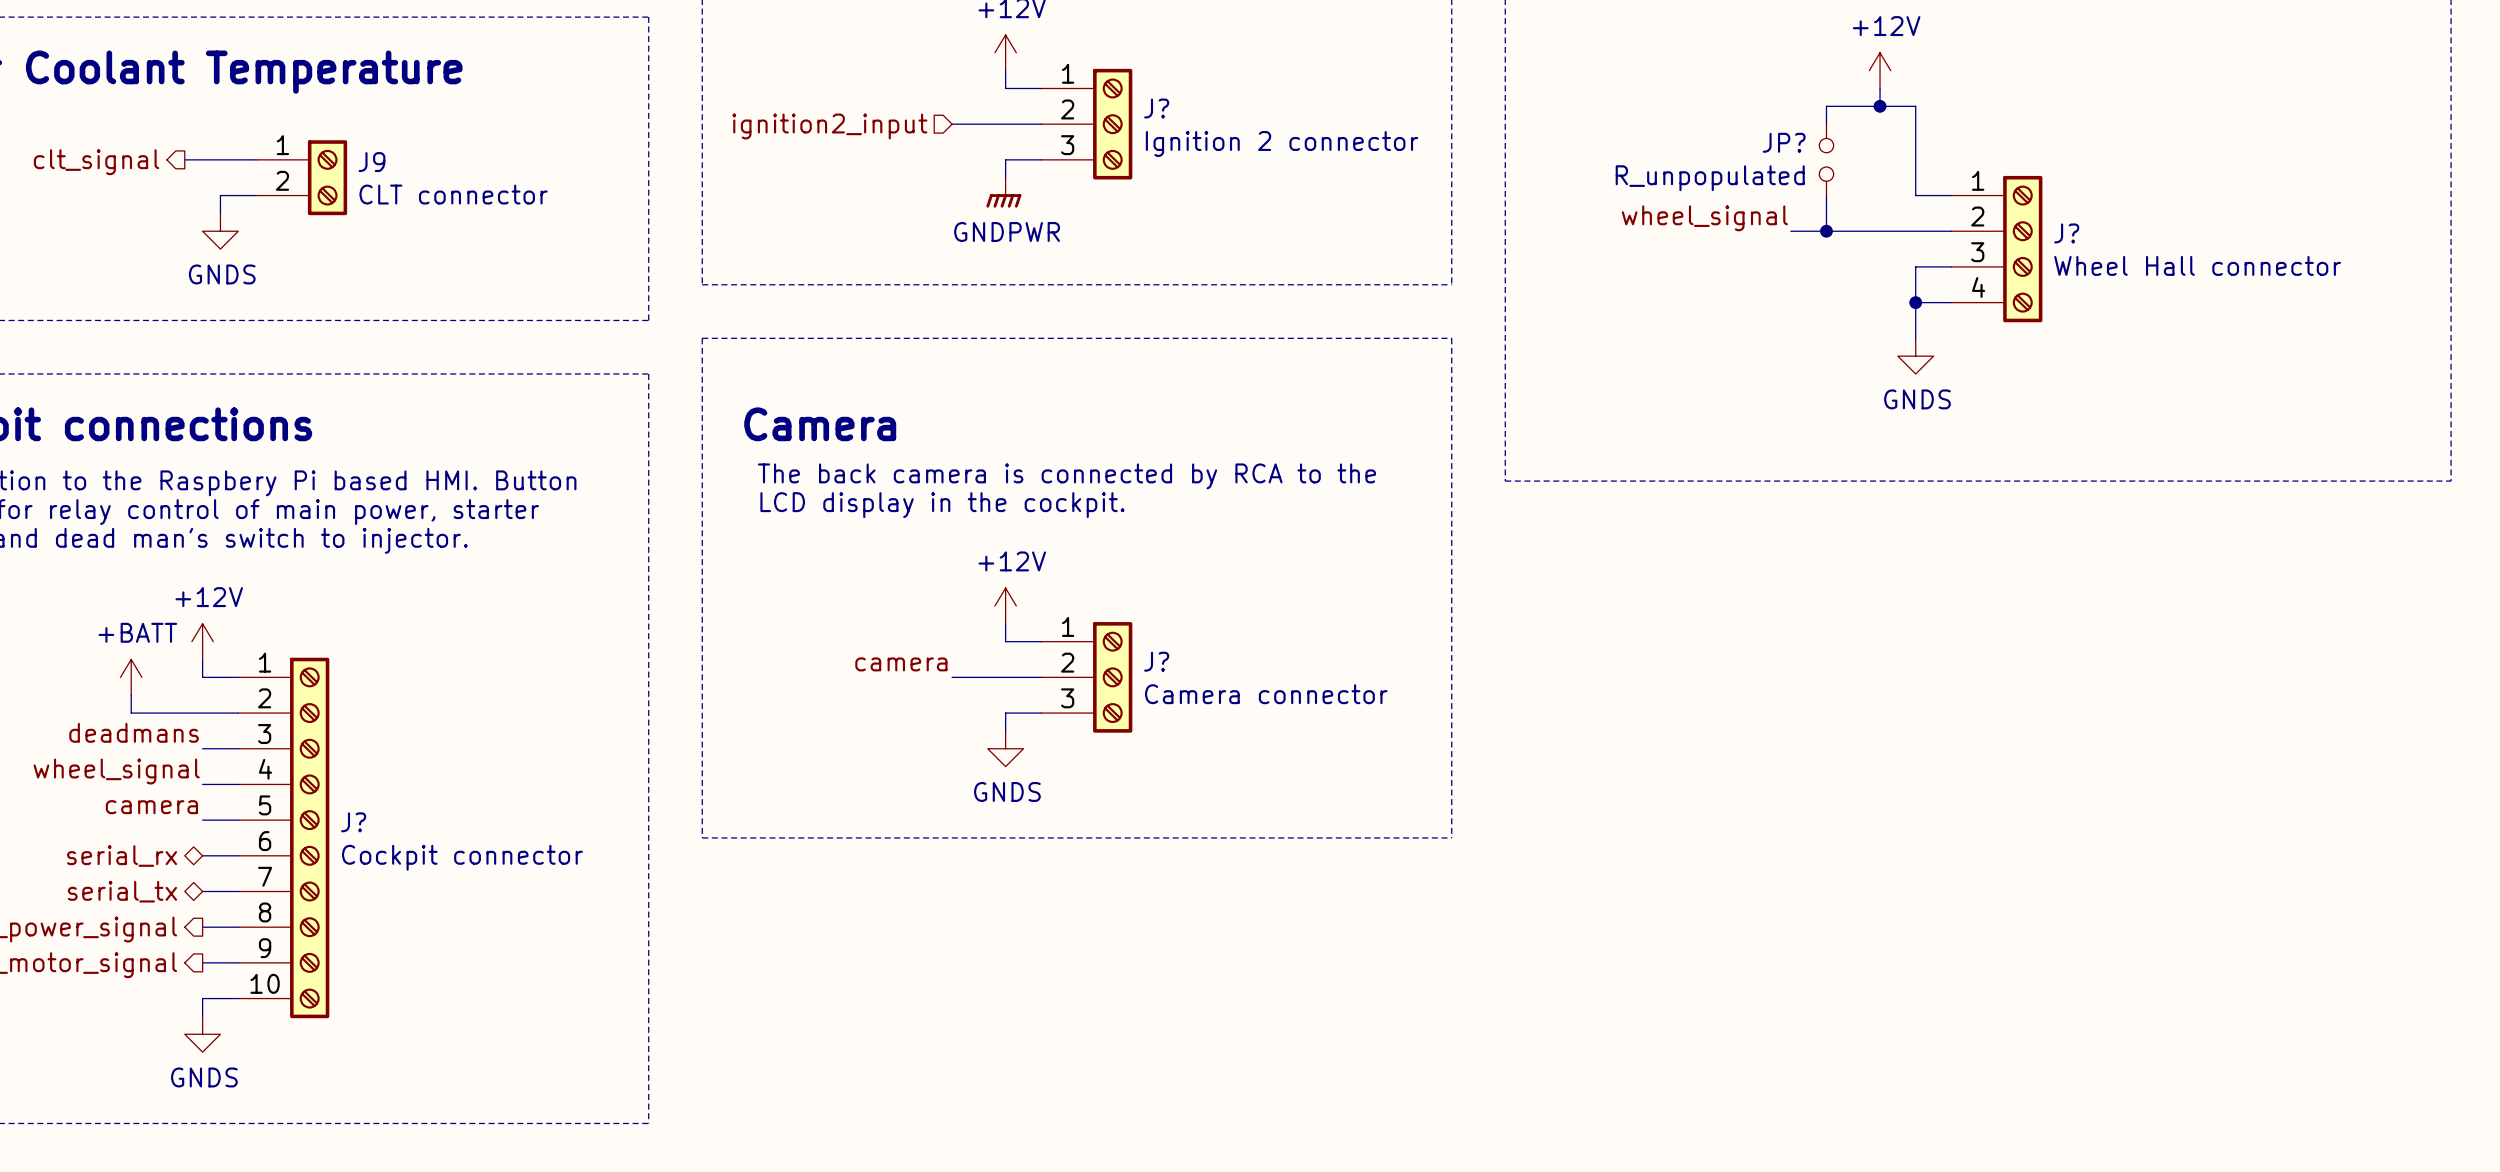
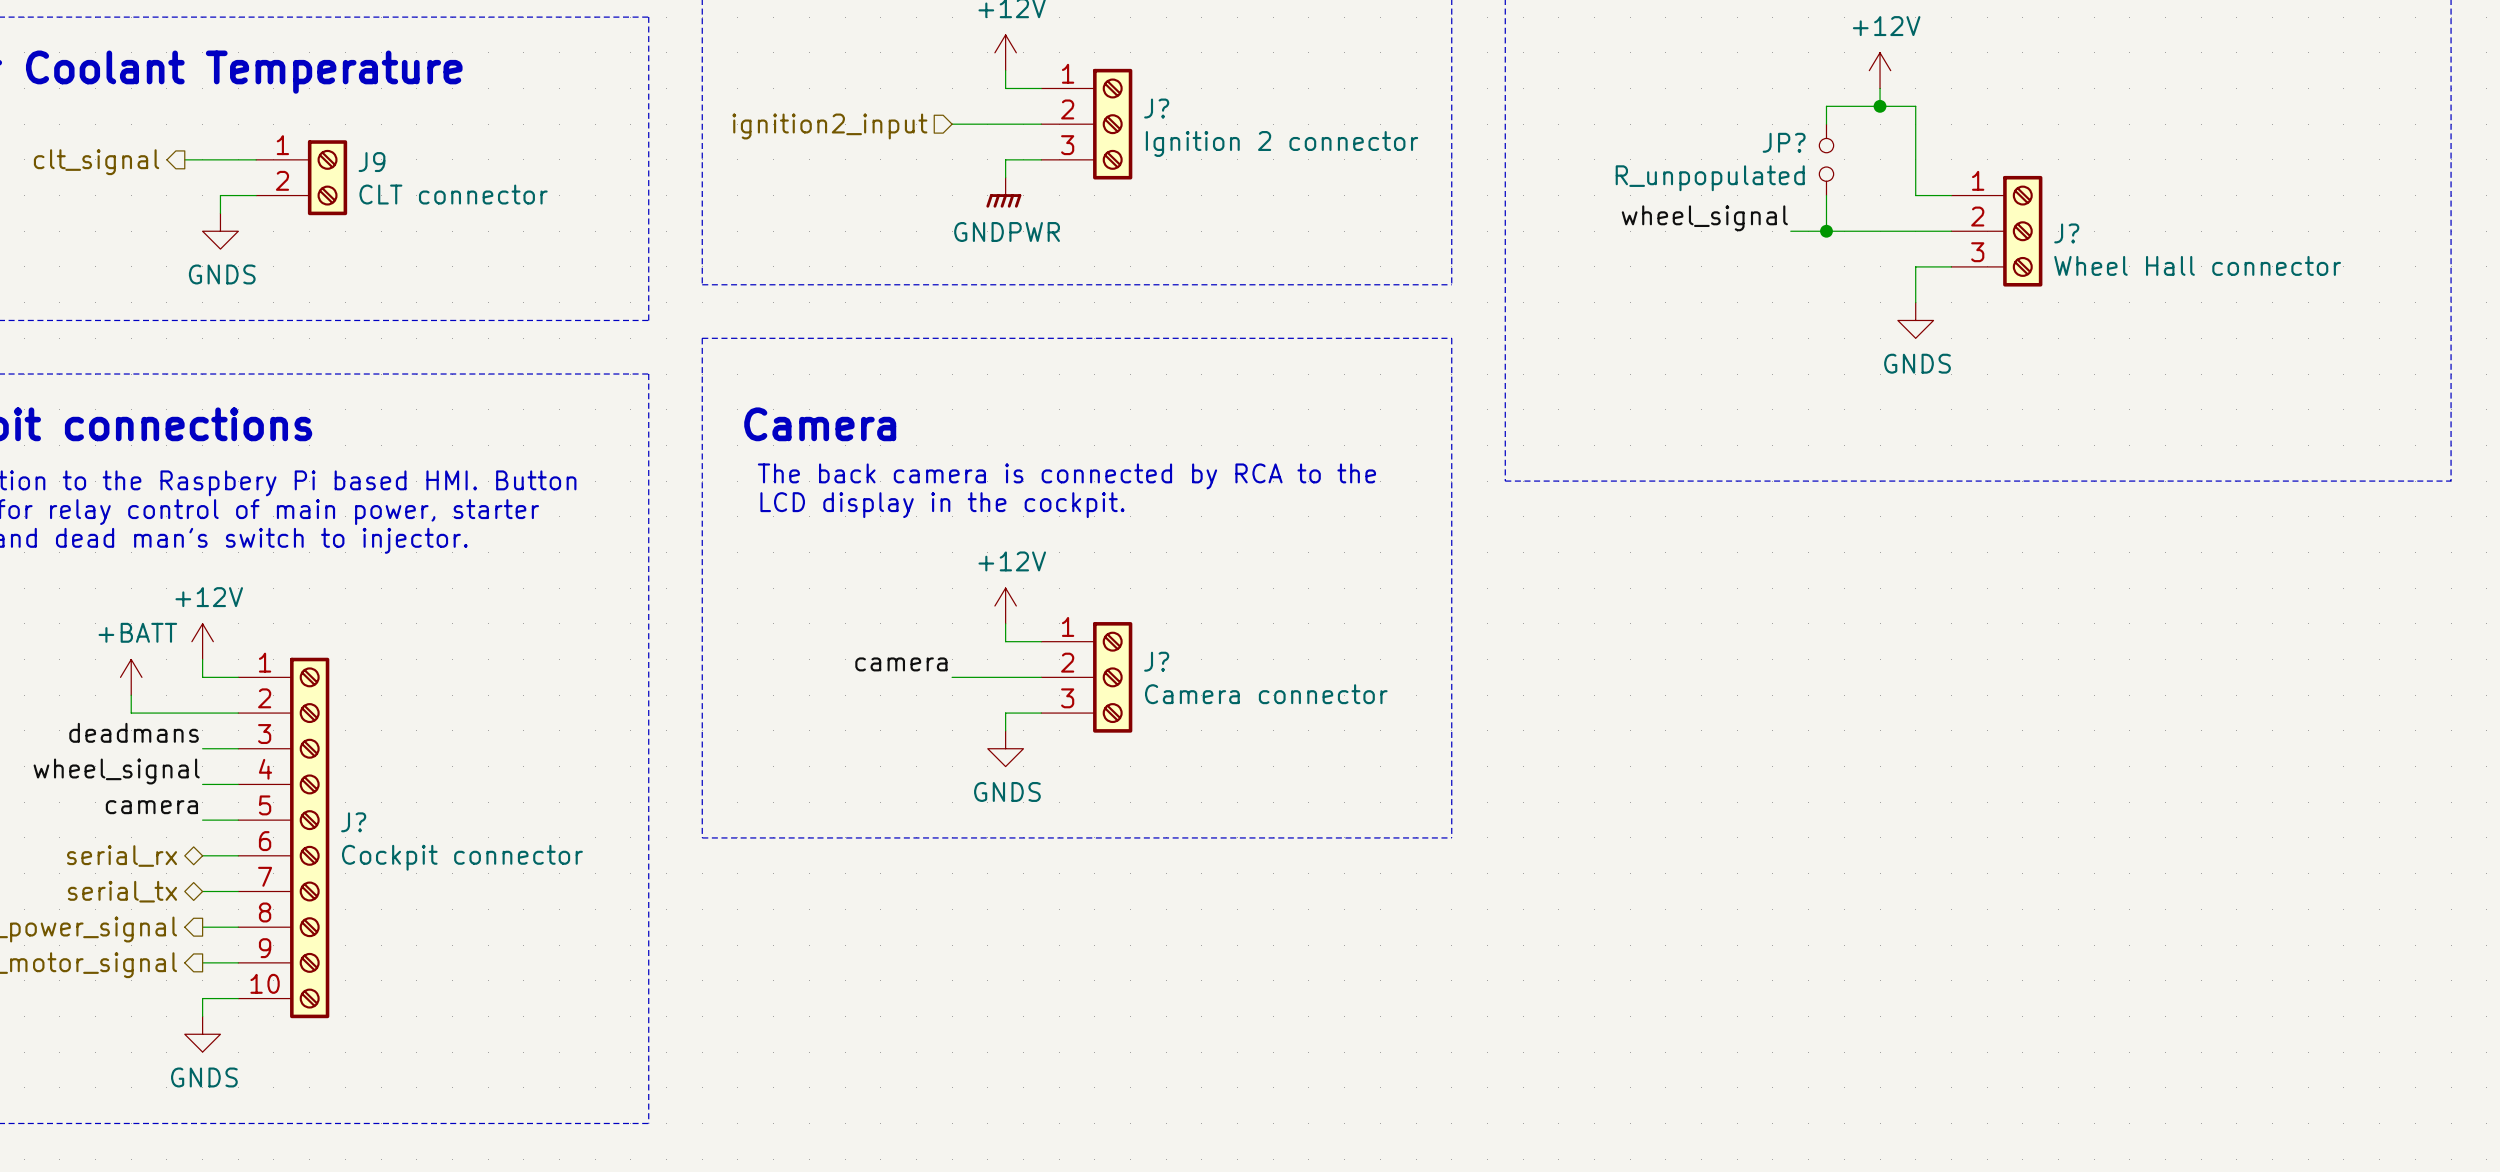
J?: none -> Wheel Hall connector (1996, 231)
J?: Wheel Hall connector (1996, 249) -> none
junction: (1915, 302) -> none
wire: (1951, 302) (1915, 302) (1915, 338) -> none
power symbol position: GNDS (1915, 356) -> GNDS (1915, 320)

